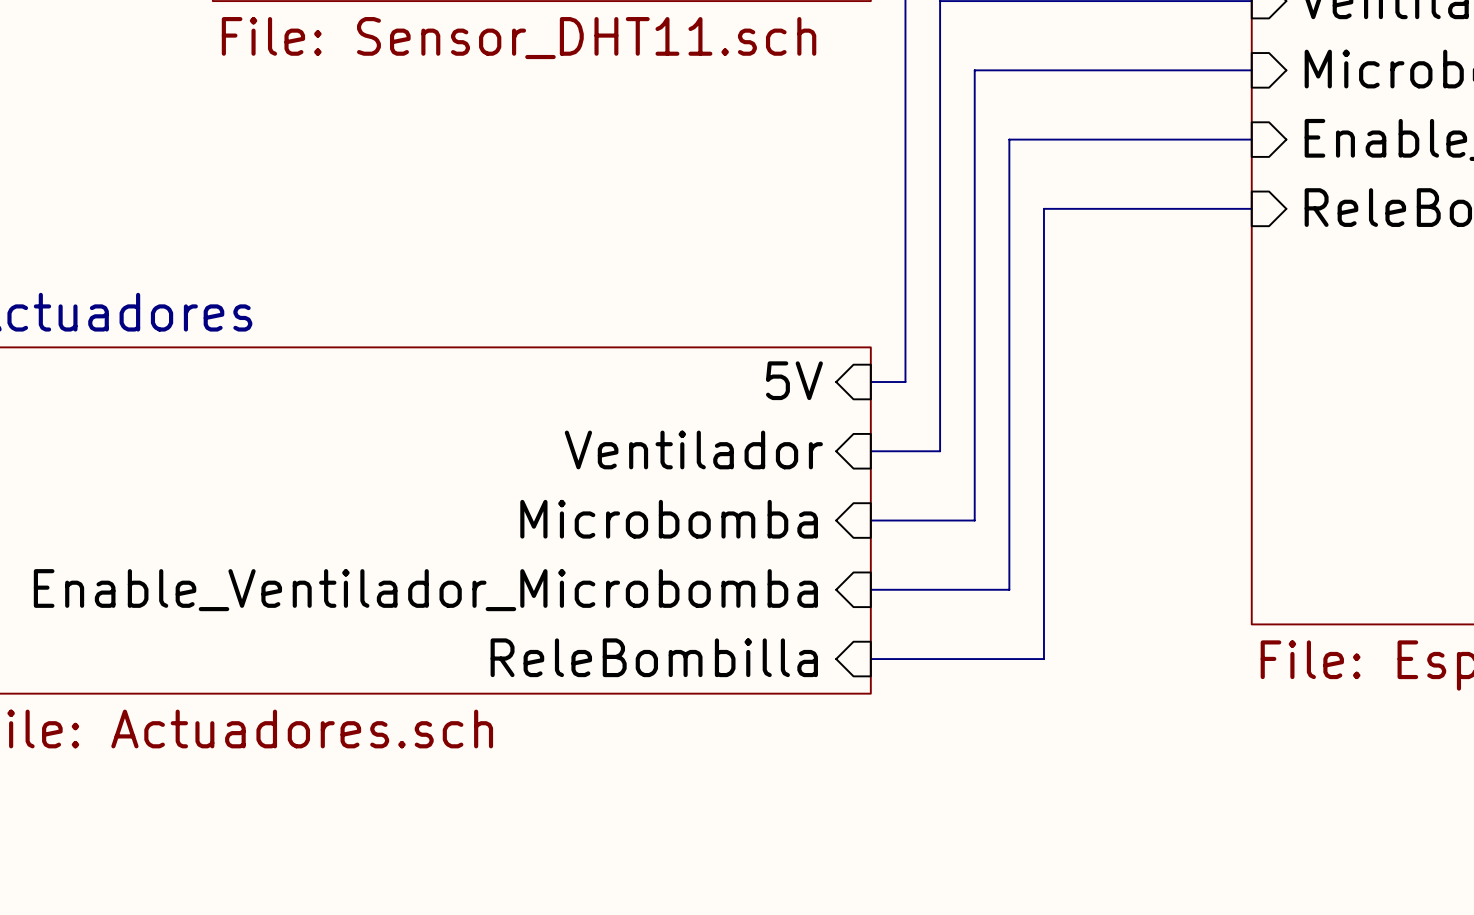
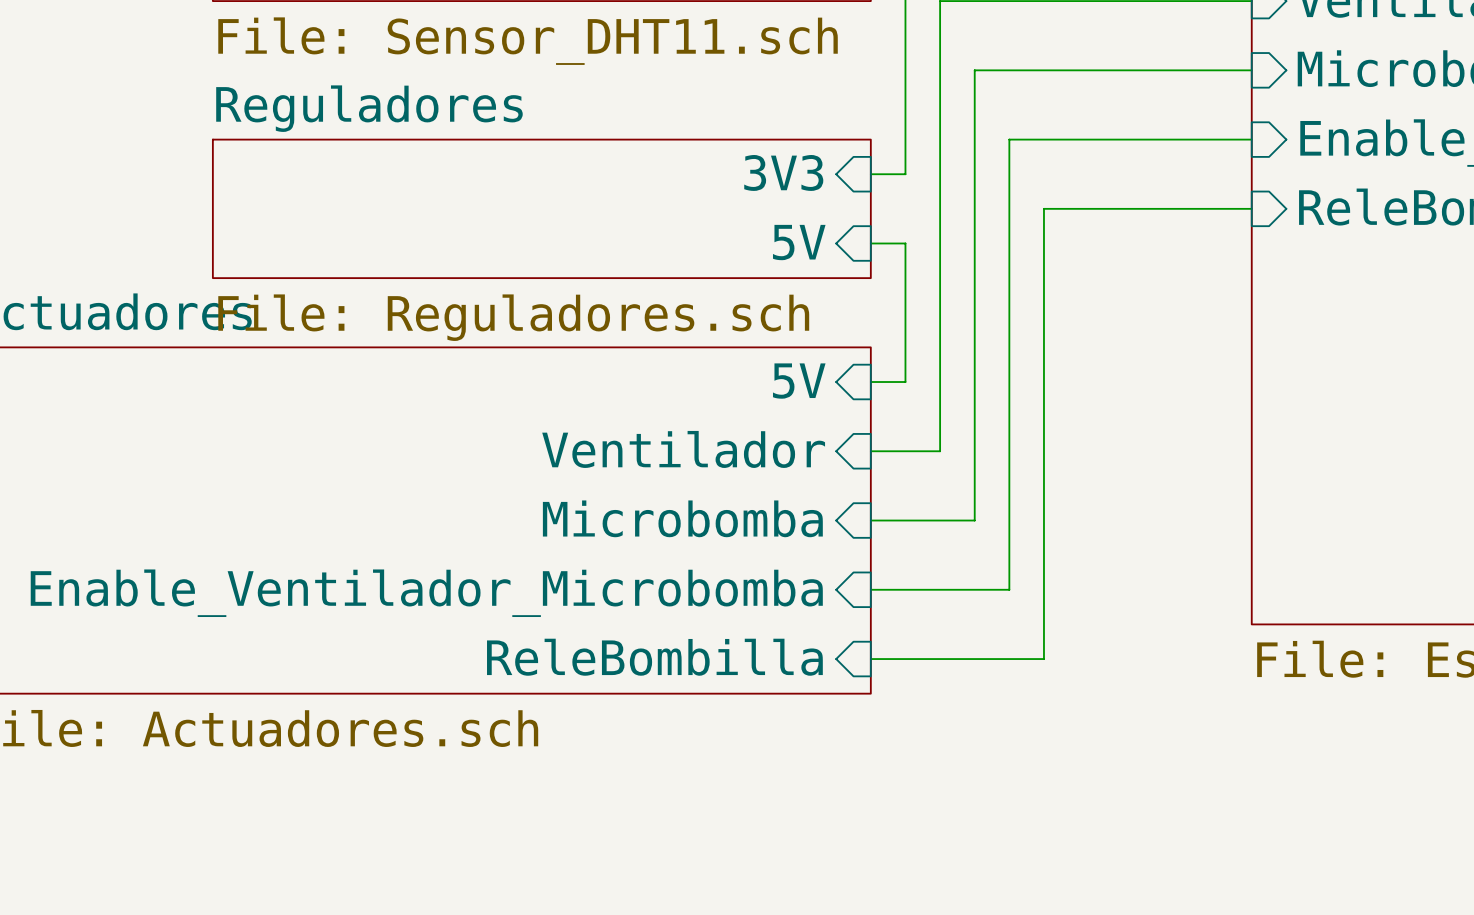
sheet pin: none -> 3V3 (783, 172)
wire: (905, 174) (905, 243) -> (905, 174) (870, 174)
sheet Reguladores: none -> File: Reguladores.sch (541, 208)
sheet pin: none -> 5V (799, 242)
wire: none -> (870, 243) (905, 243)

